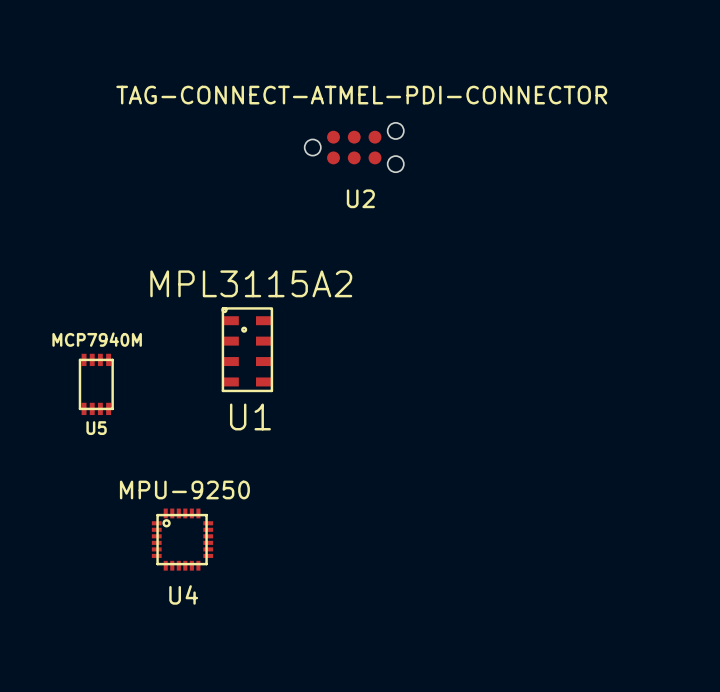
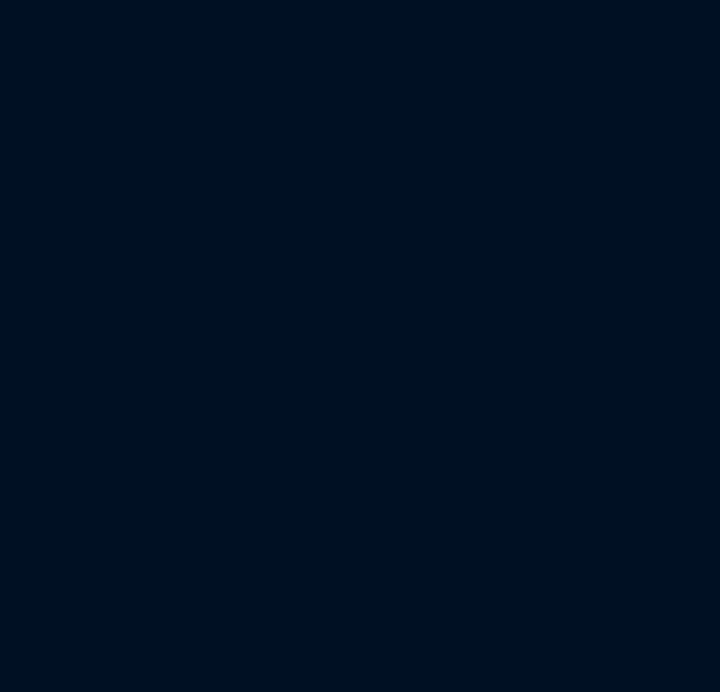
U2: TAG-CONNECT-ATMEL-PDI-CONNECTOR (354, 147) -> none
U1: MPL3115A2 (247, 349) -> none
U5: MCP7940M (96, 384) -> none
U4: MPU-9250 (182, 539) -> none

